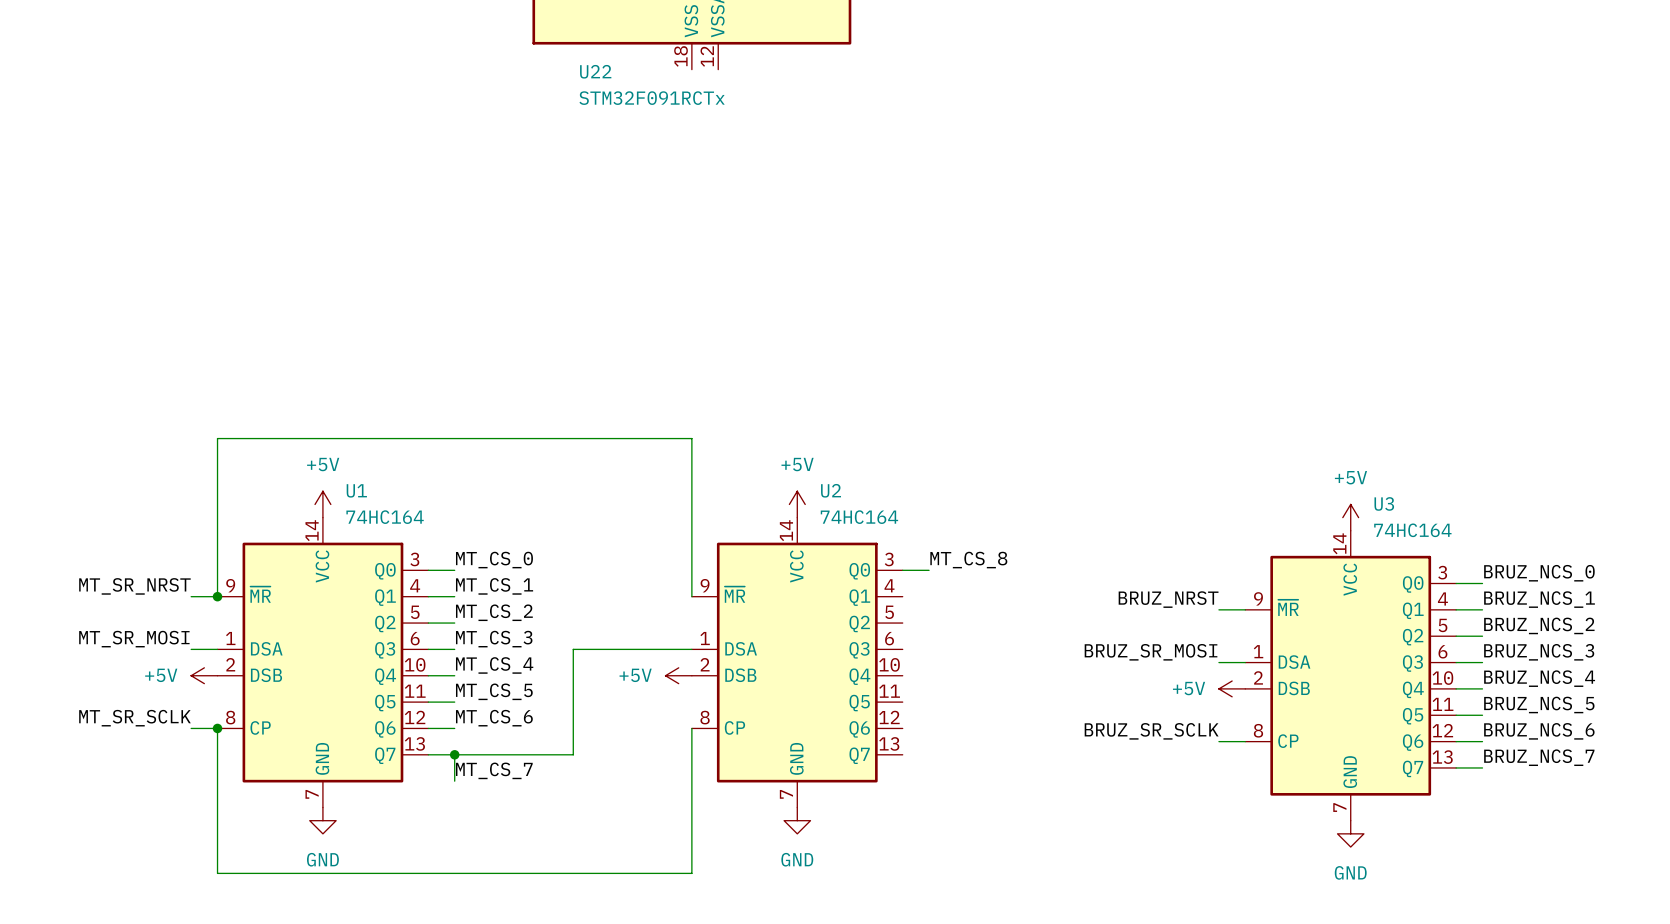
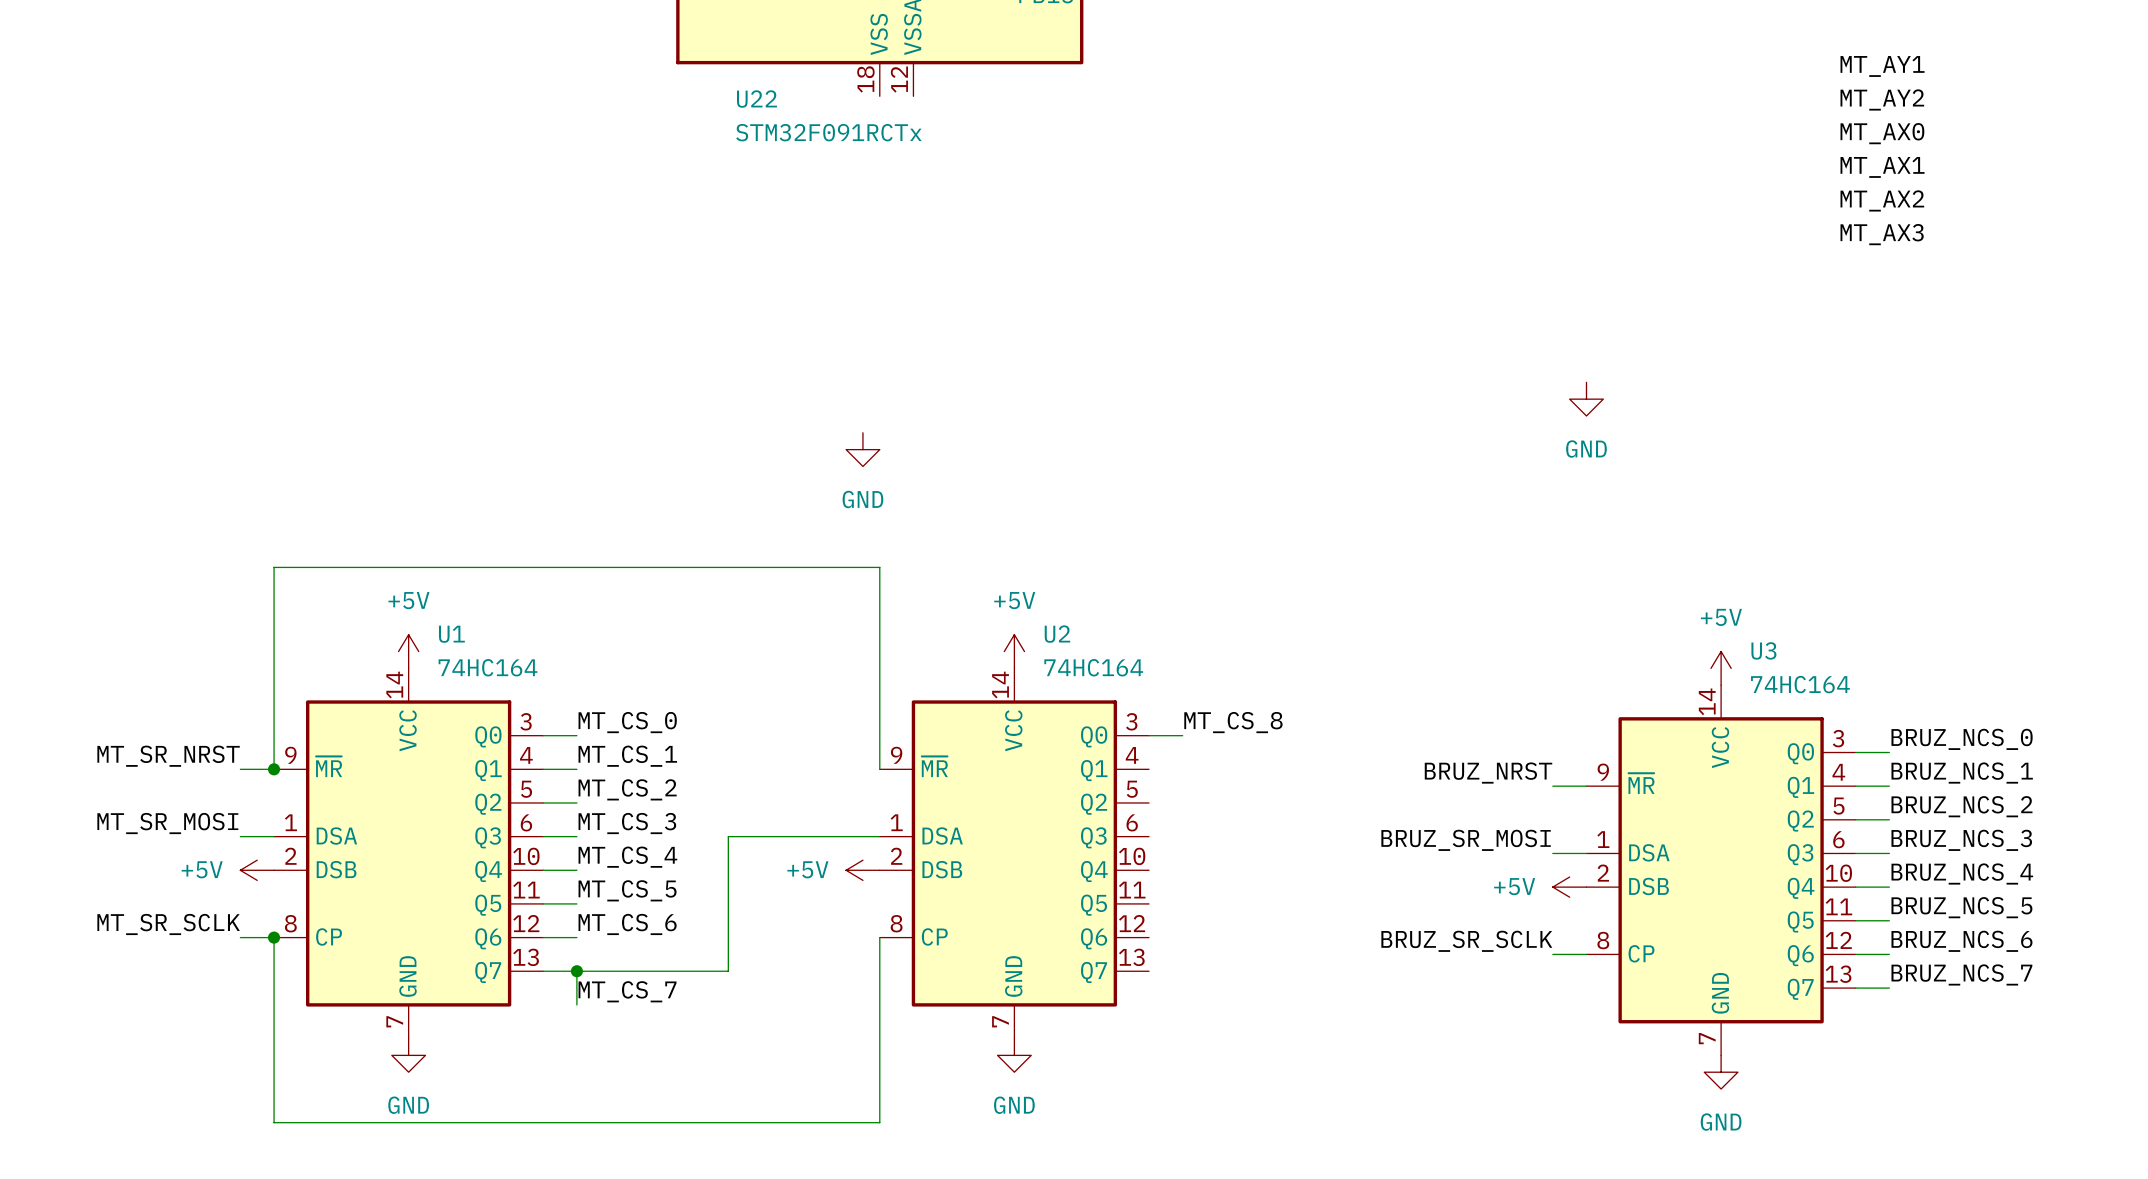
label: none -> MT_AY1 (1882, 66)
label: none -> MT_AY2 (1882, 99)
label: none -> MT_AX0 (1882, 133)
label: none -> MT_AX1 (1882, 167)
label: none -> MT_AX2 (1882, 200)
label: none -> MT_AX3 (1882, 234)
power symbol: none -> GND (1586, 399)
power symbol: none -> GND (862, 449)

